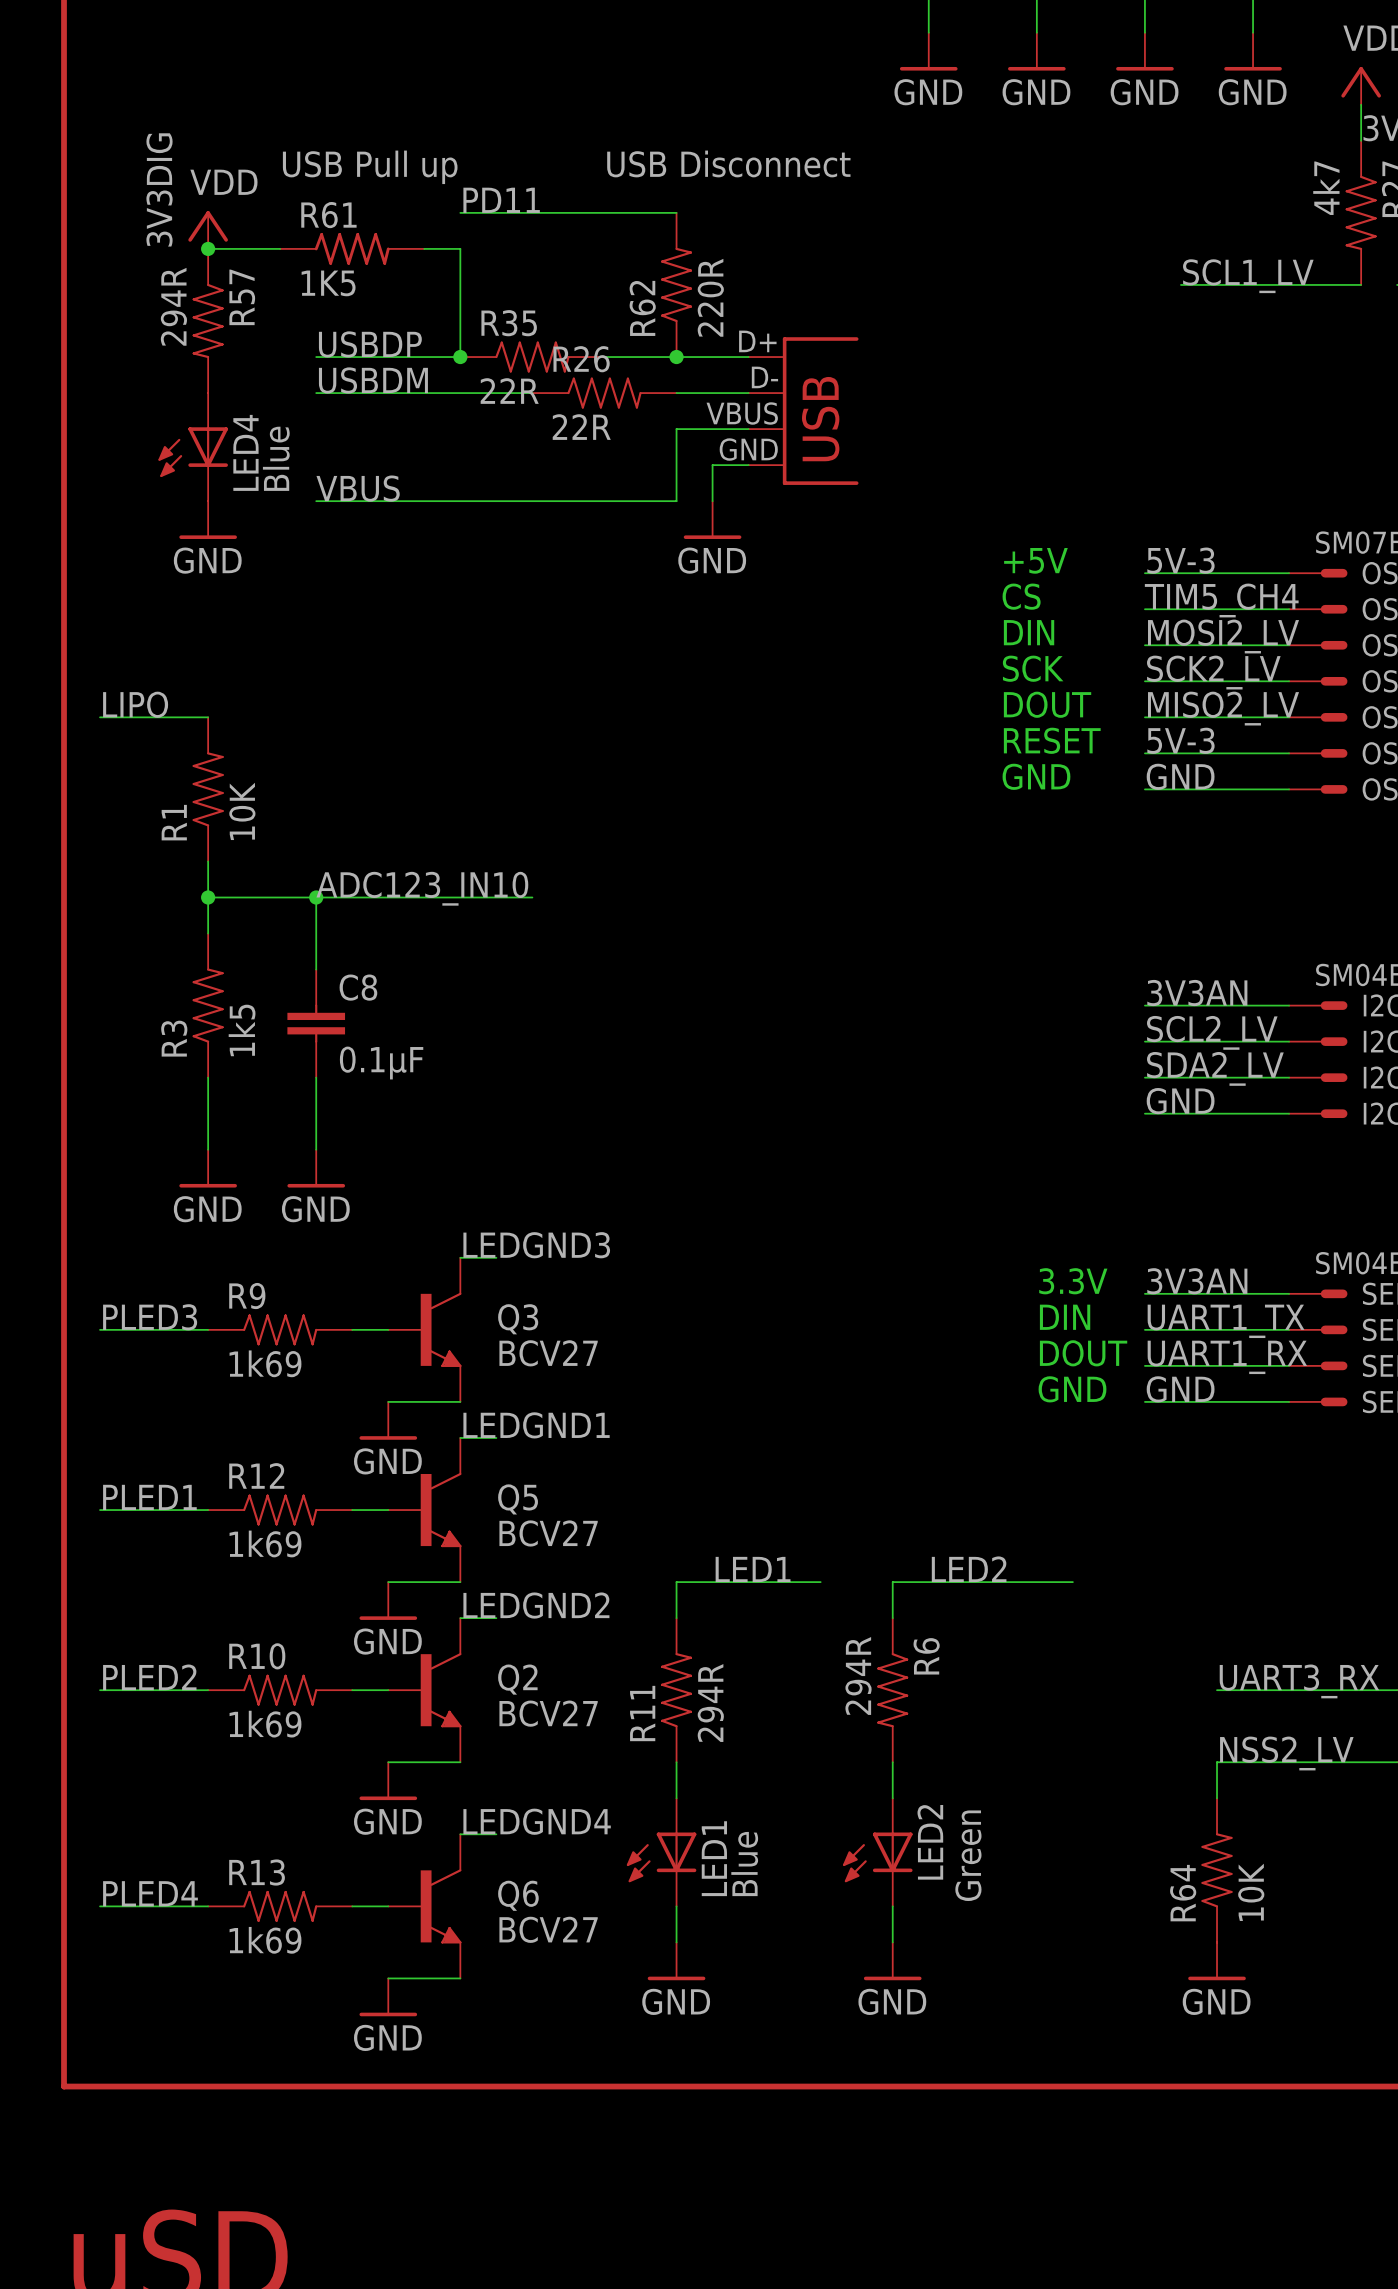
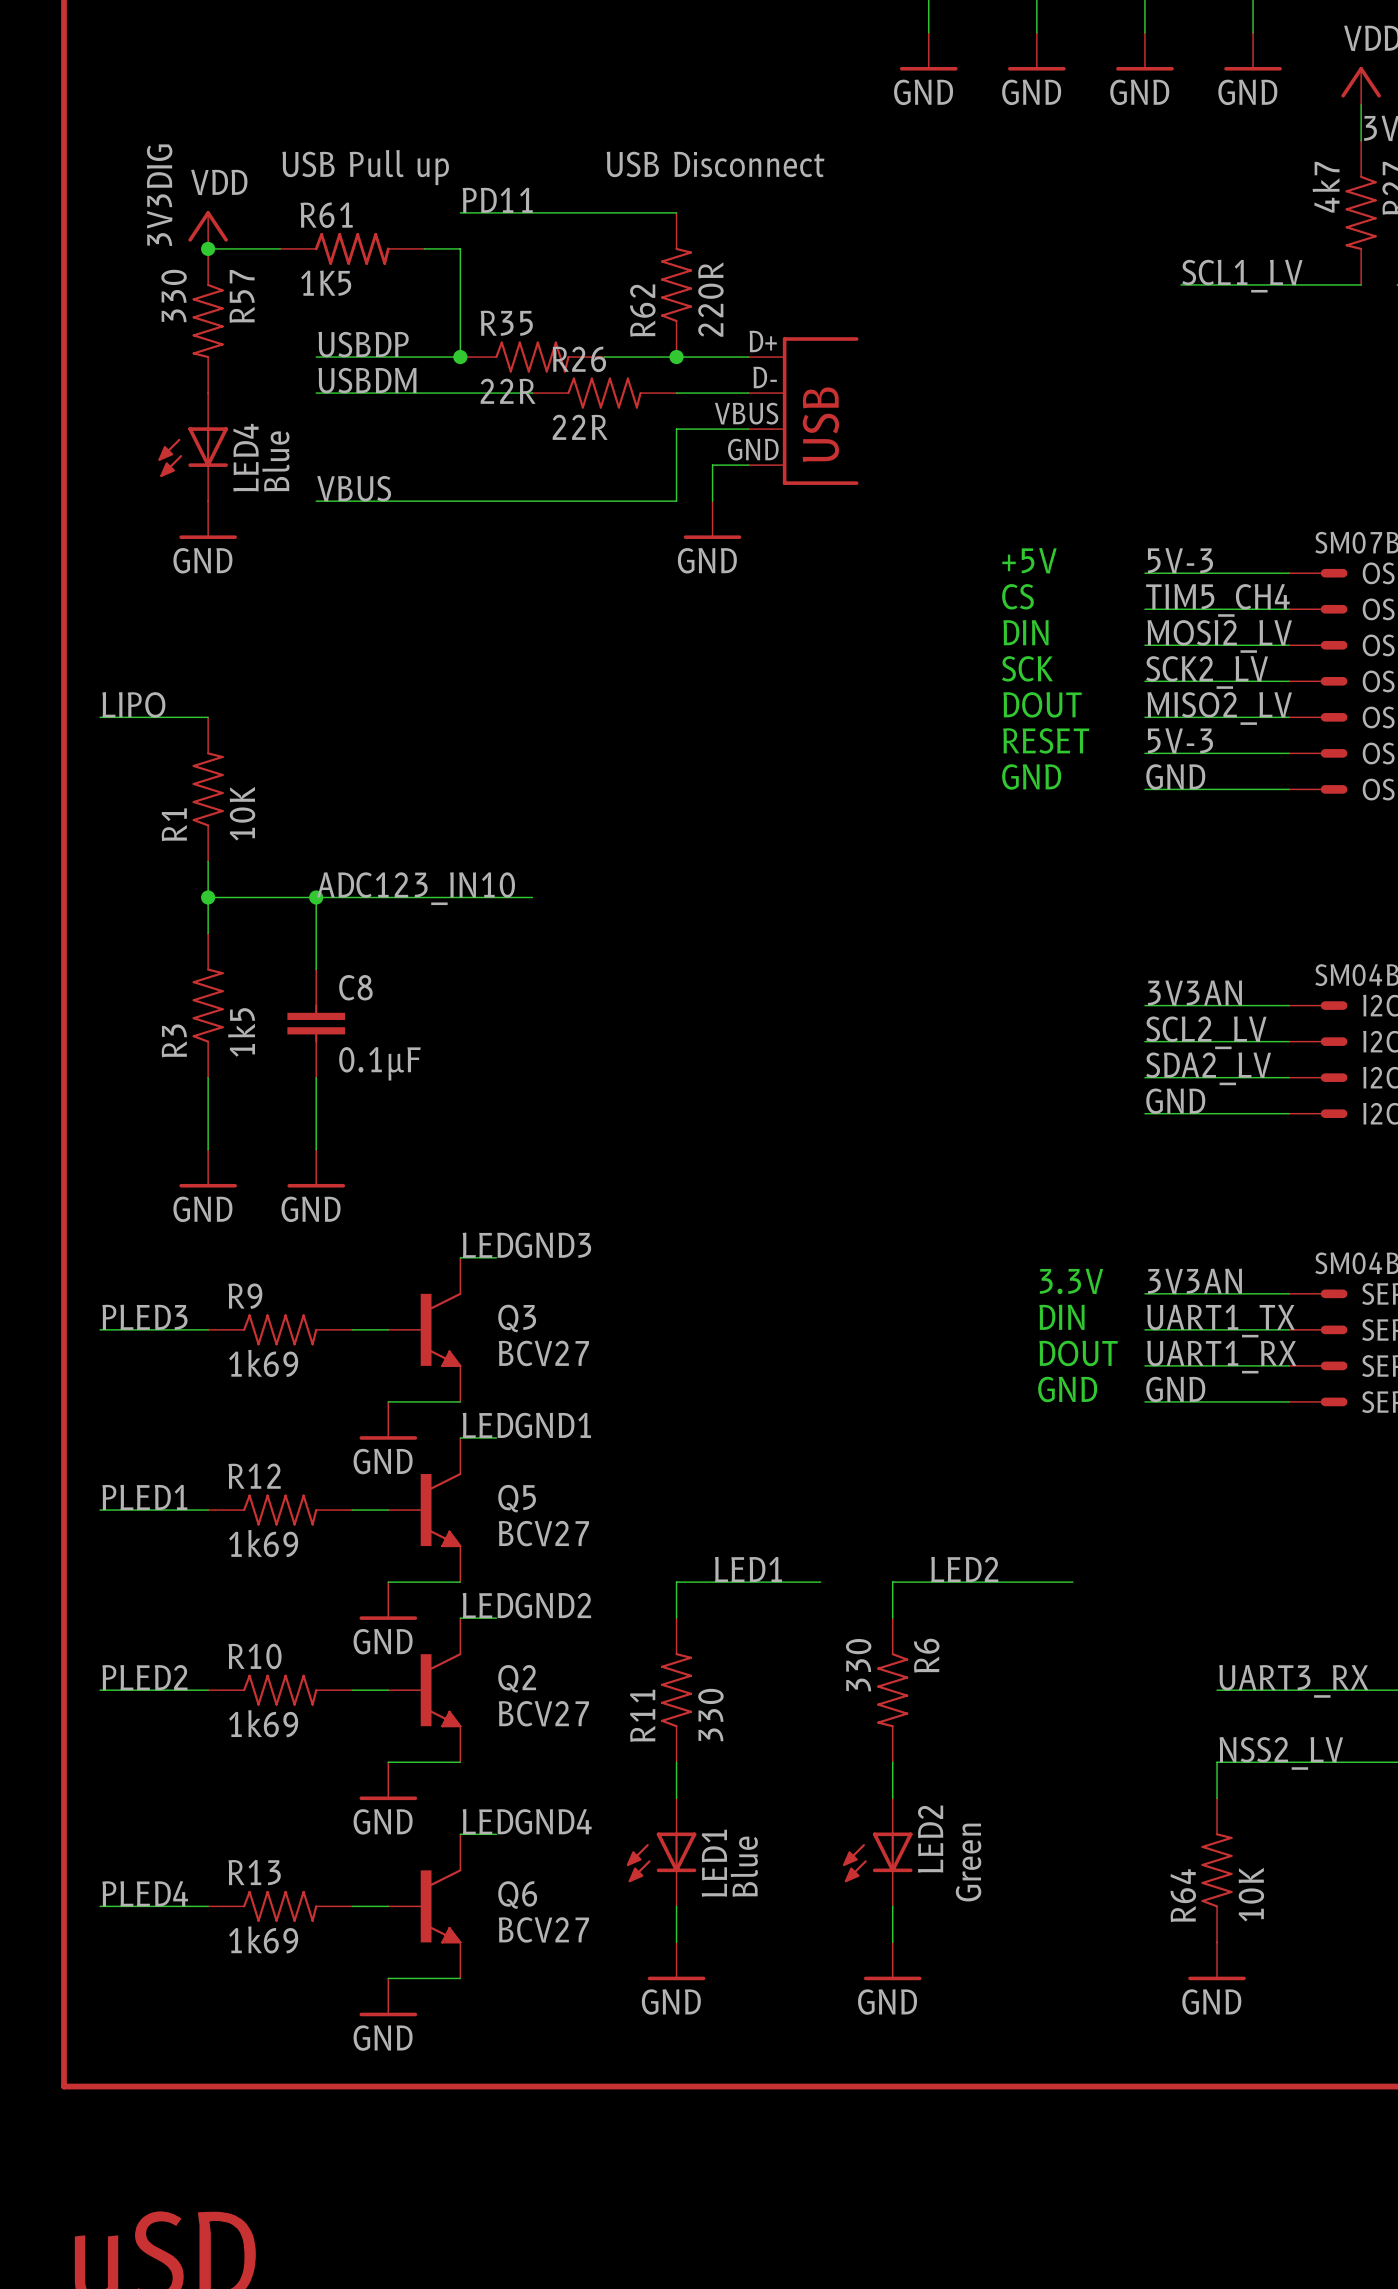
R57 value: 294R (173, 306) -> 330 (174, 295)
R6 value: 294R (858, 1675) -> 330 (858, 1665)
R11 value: 294R (710, 1703) -> 330 (710, 1715)

